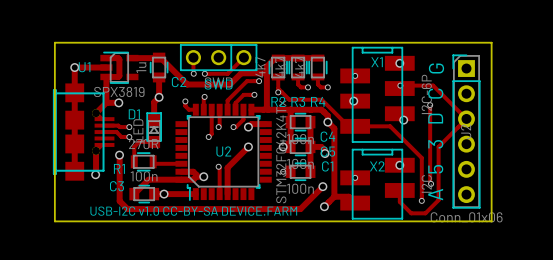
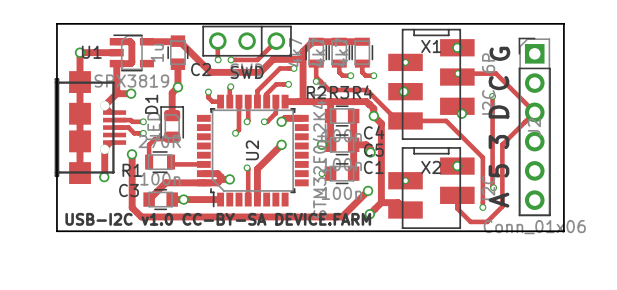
D1 footprint: [146, 112, 162, 148] -> [160, 106, 184, 143]
D1 name rotation: 0° (134, 114) -> 90° counterclockwise (151, 104)
U2 name rotation: 0° (223, 151) -> 90° counterclockwise (252, 150)

